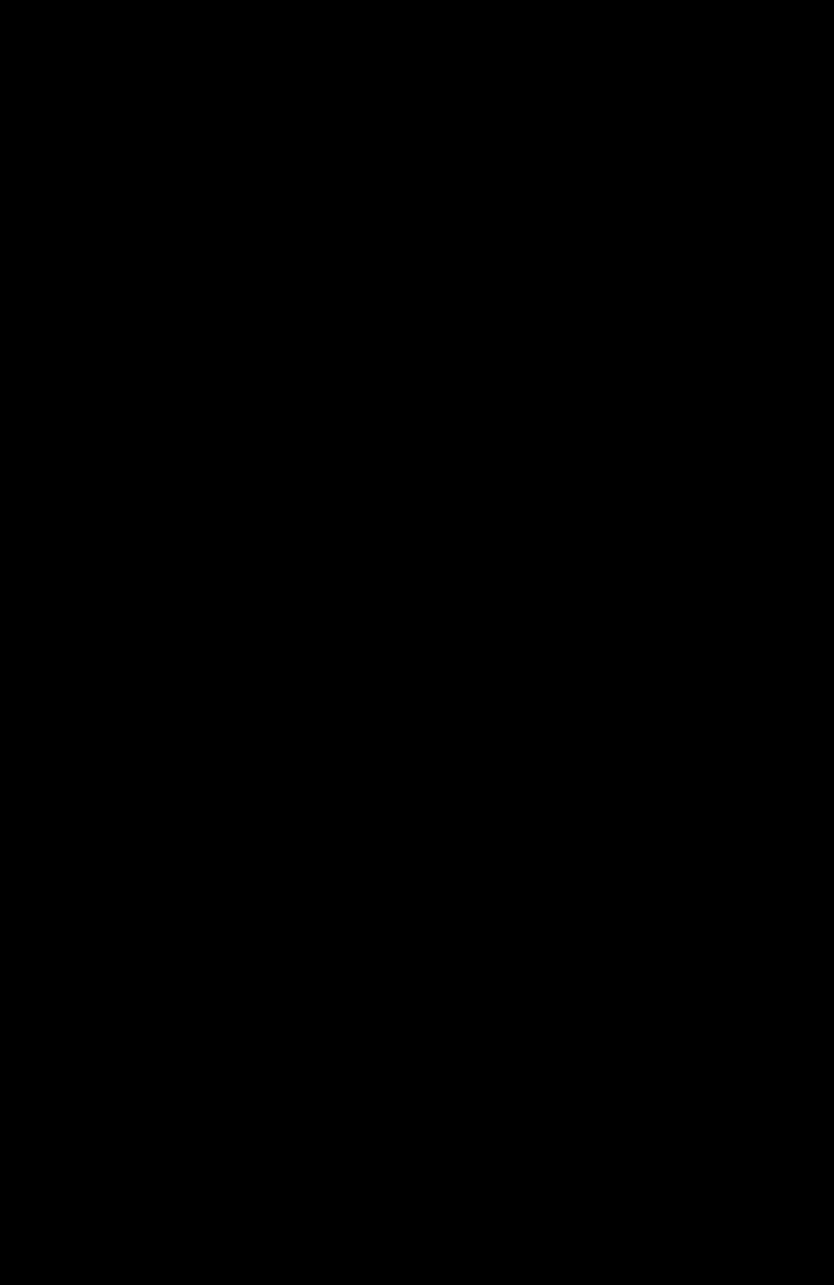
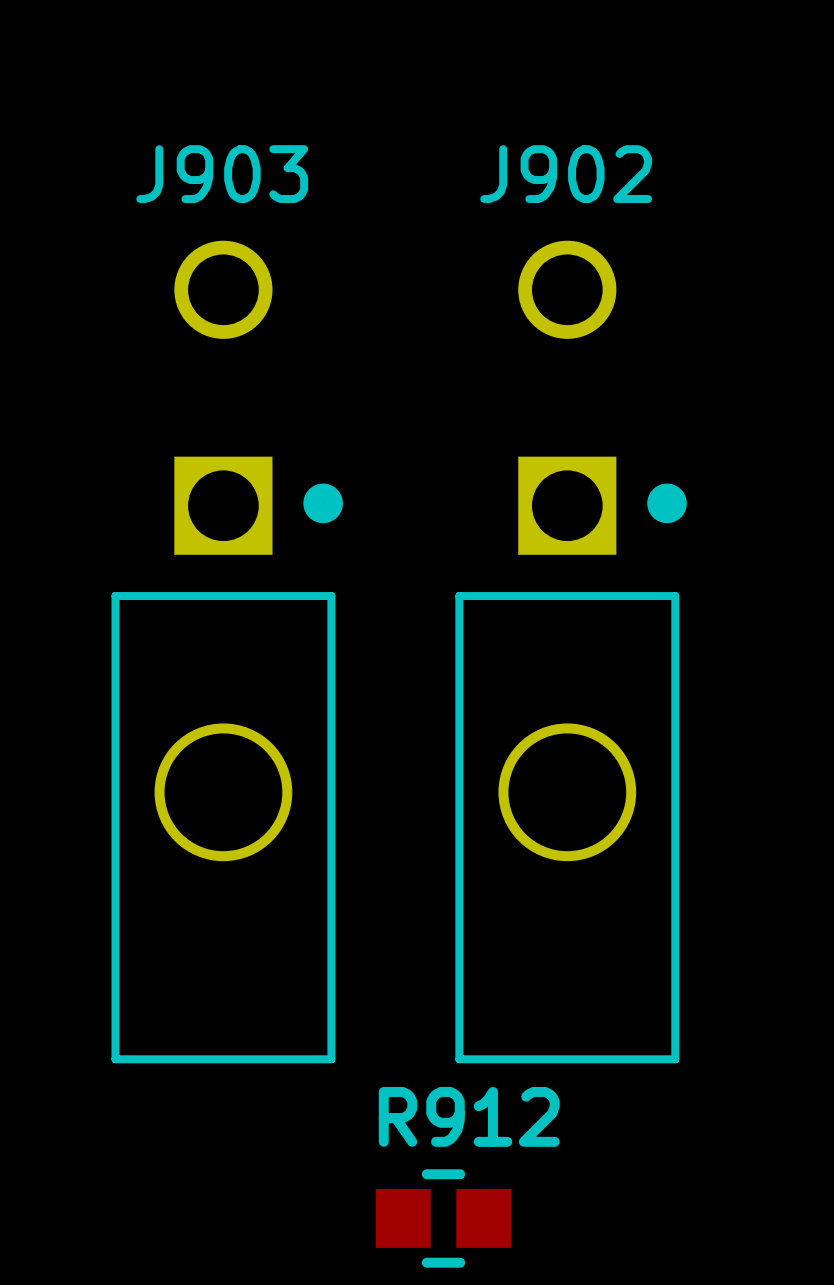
J903: none -> (227, 651)
J902: none -> (571, 651)
R912: none -> (443, 1218)

